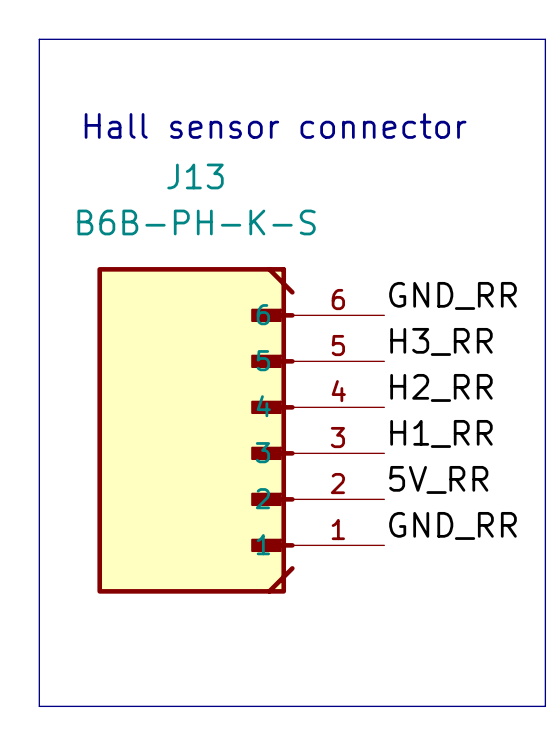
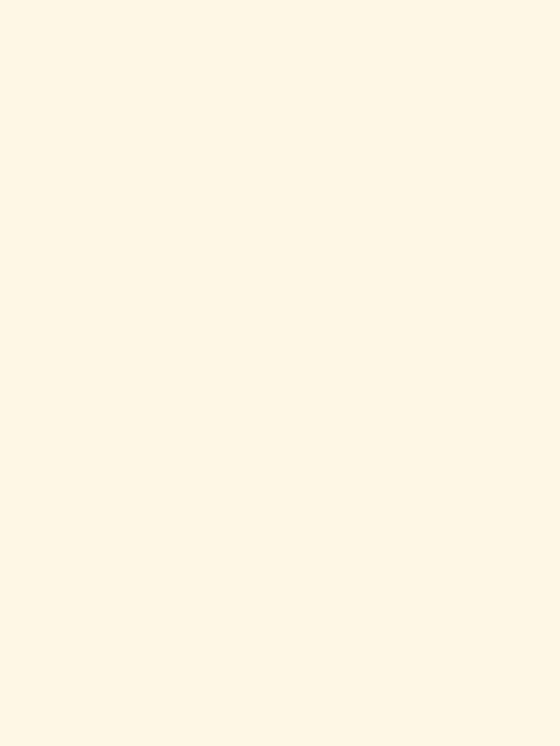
line: (39, 39) (545, 39) (545, 706) (39, 706) (39, 39) -> none
text: Hall sensor connector (275, 125) -> none
label: GND_RR (452, 295) -> none
label: H3_RR (441, 341) -> none
label: H2_RR (441, 387) -> none
J13: B6B-PH-K-S (240, 430) -> none
label: H1_RR (441, 433) -> none
label: 5V_RR (438, 479) -> none
label: GND_RR (452, 525) -> none

